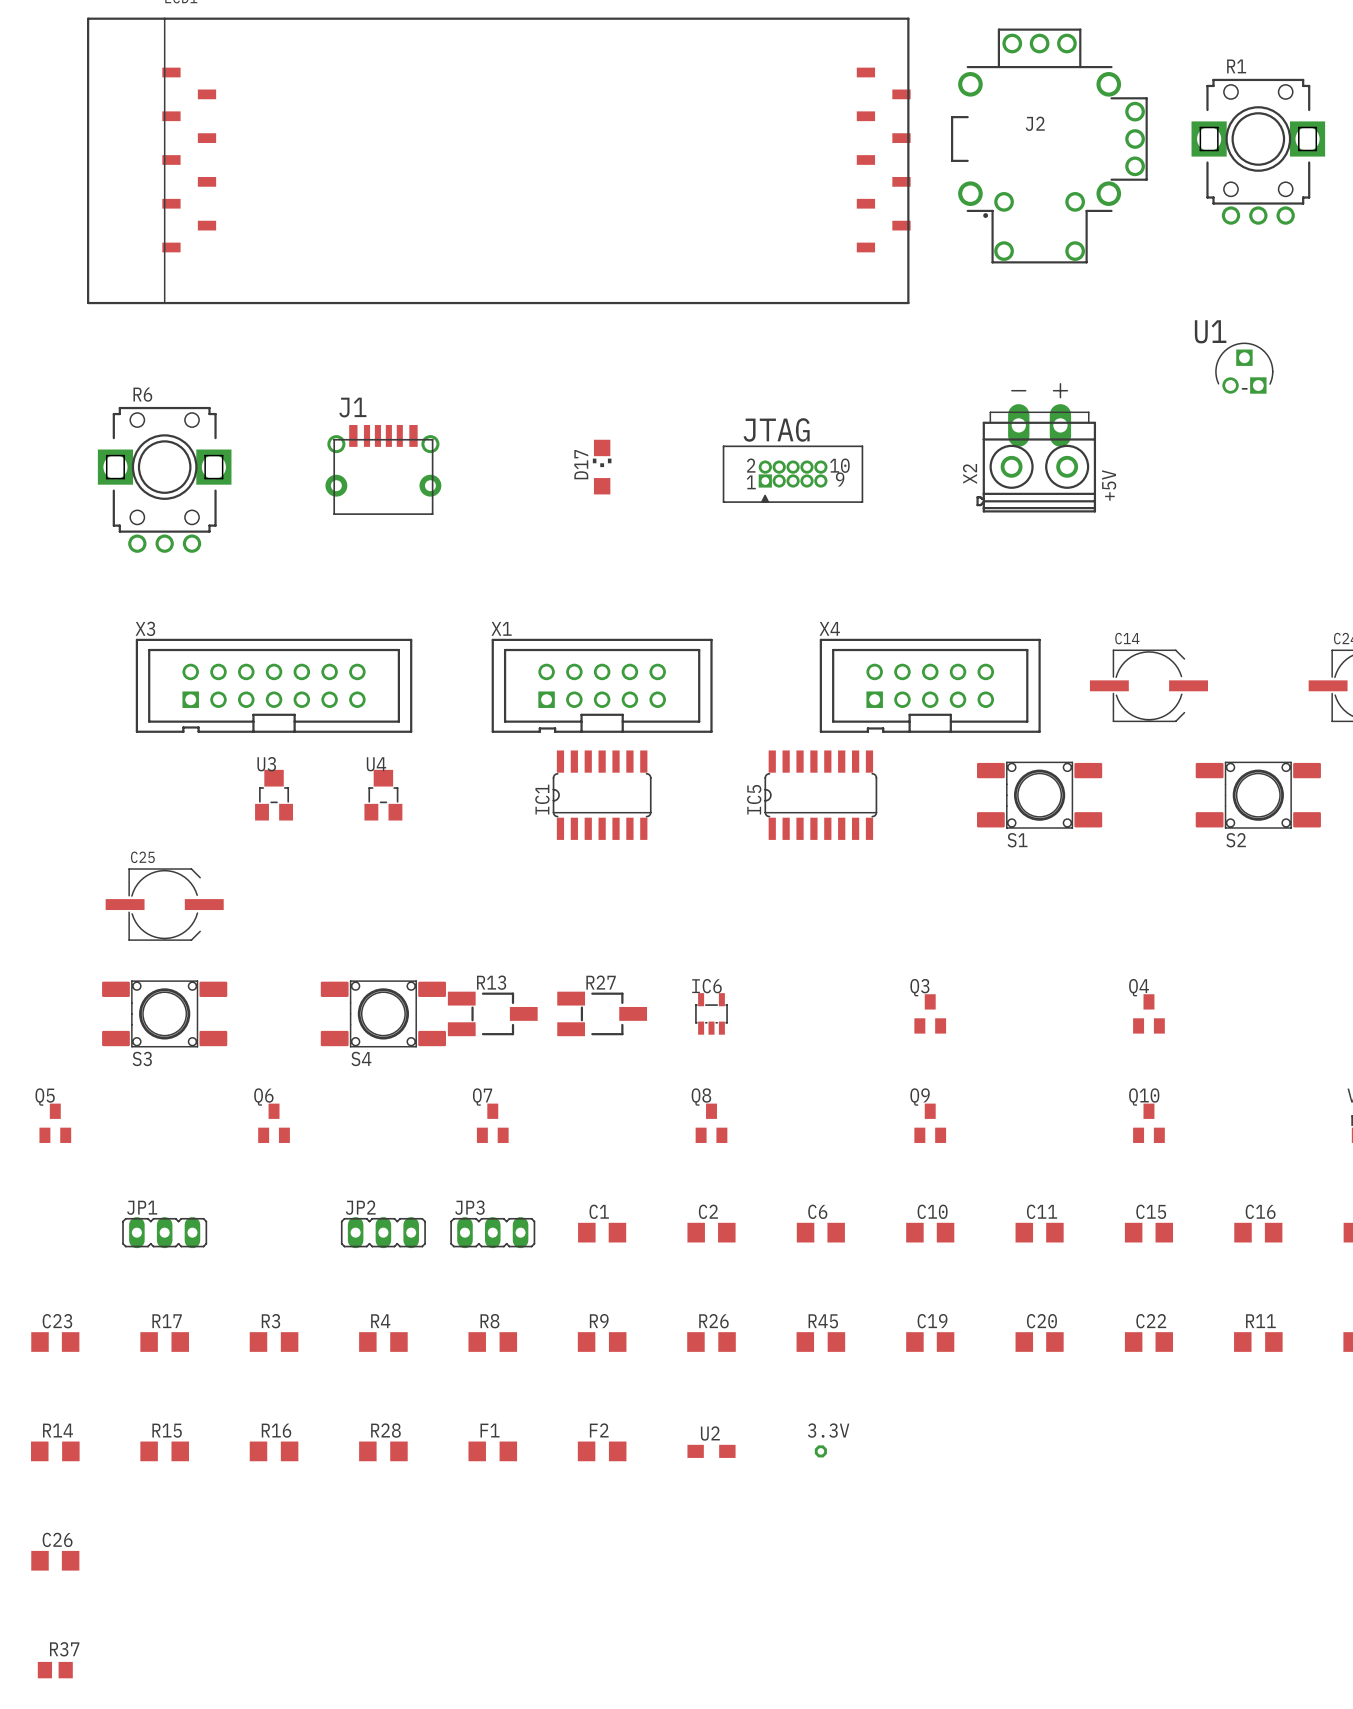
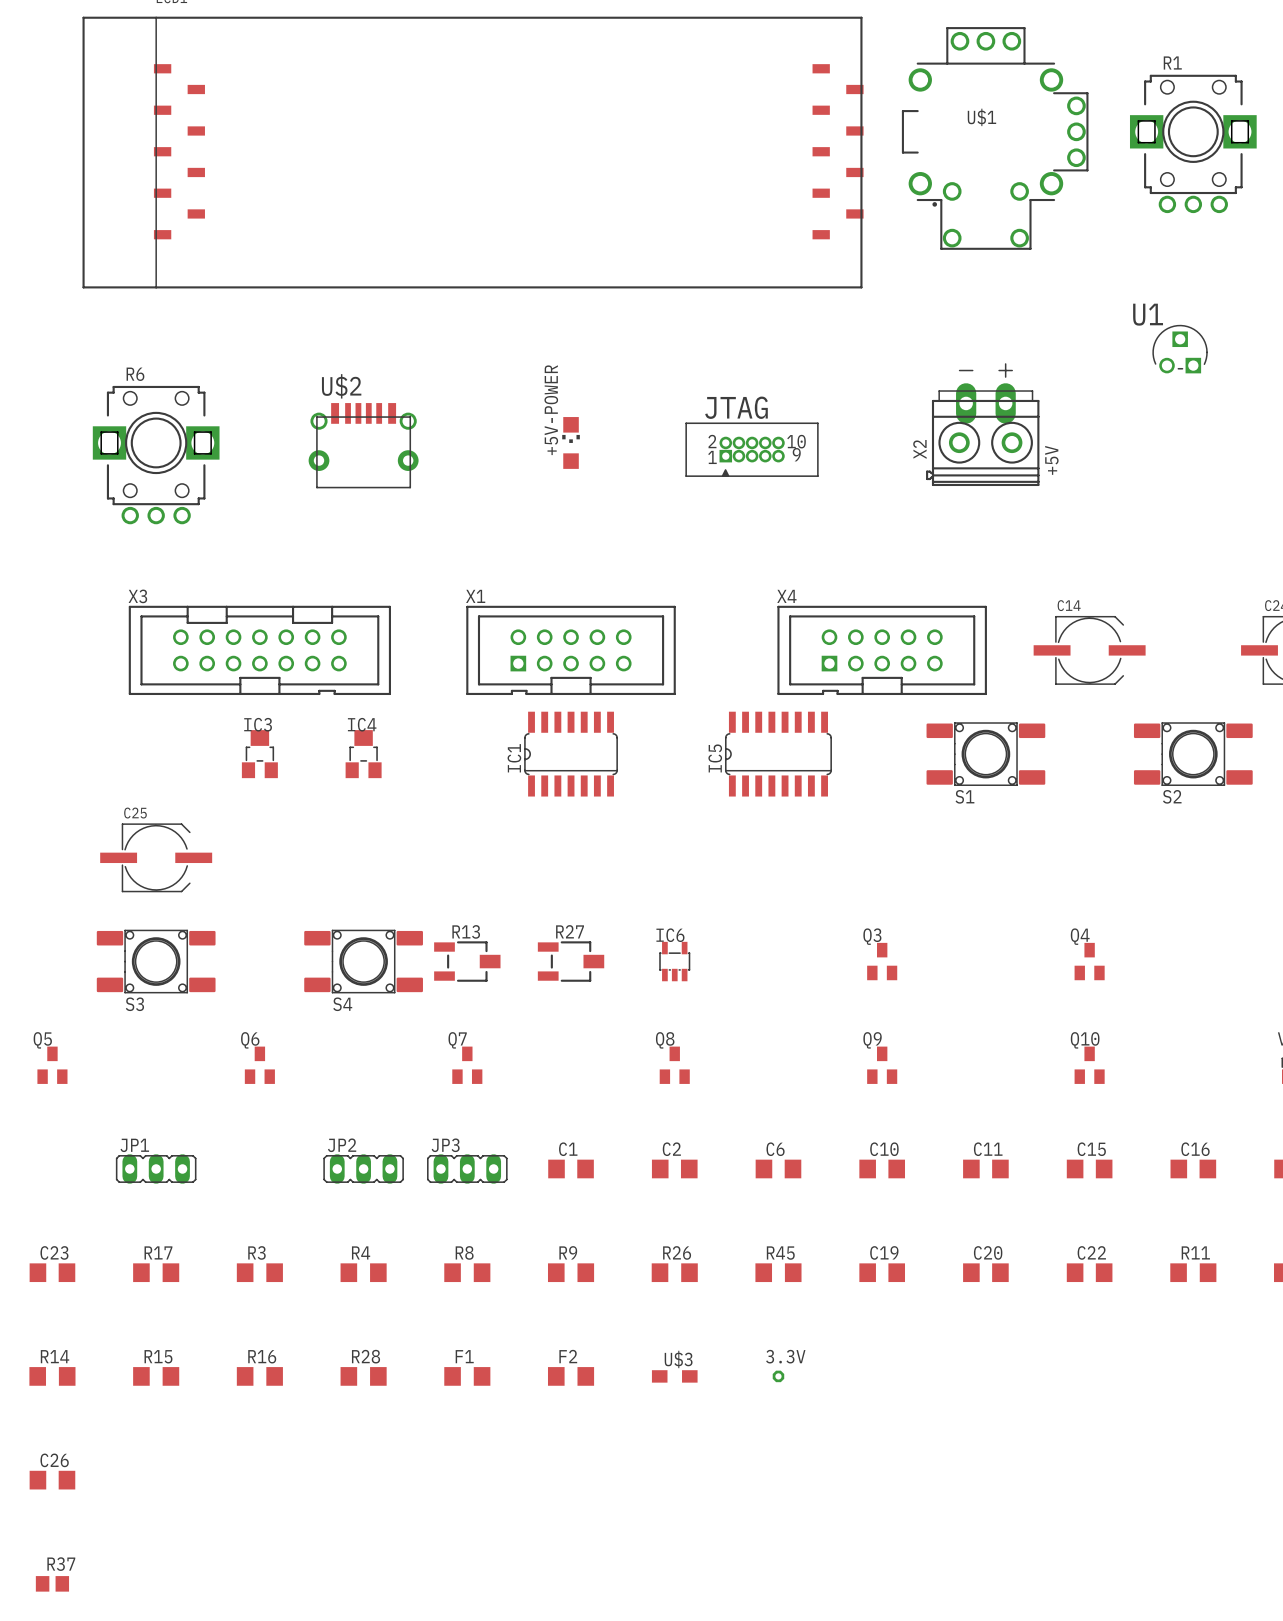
J2 name: J2 (1035, 123) -> U$1 (981, 117)
J1 name: J1 (352, 407) -> U$2 (341, 386)
D17 name: D17 (581, 464) -> +5V-POWER (551, 410)
X3 footprint: [135, 638, 413, 733] -> [128, 605, 392, 696]
U3 name: U3 (266, 764) -> IC3 (258, 724)
U4 name: U4 (376, 764) -> IC4 (362, 724)
R13 footprint: [447, 991, 538, 1037] -> [434, 941, 501, 982]
R27 footprint: [557, 991, 648, 1037] -> [537, 941, 605, 982]
U2 name: U2 (710, 1433) -> U$3 (678, 1359)

